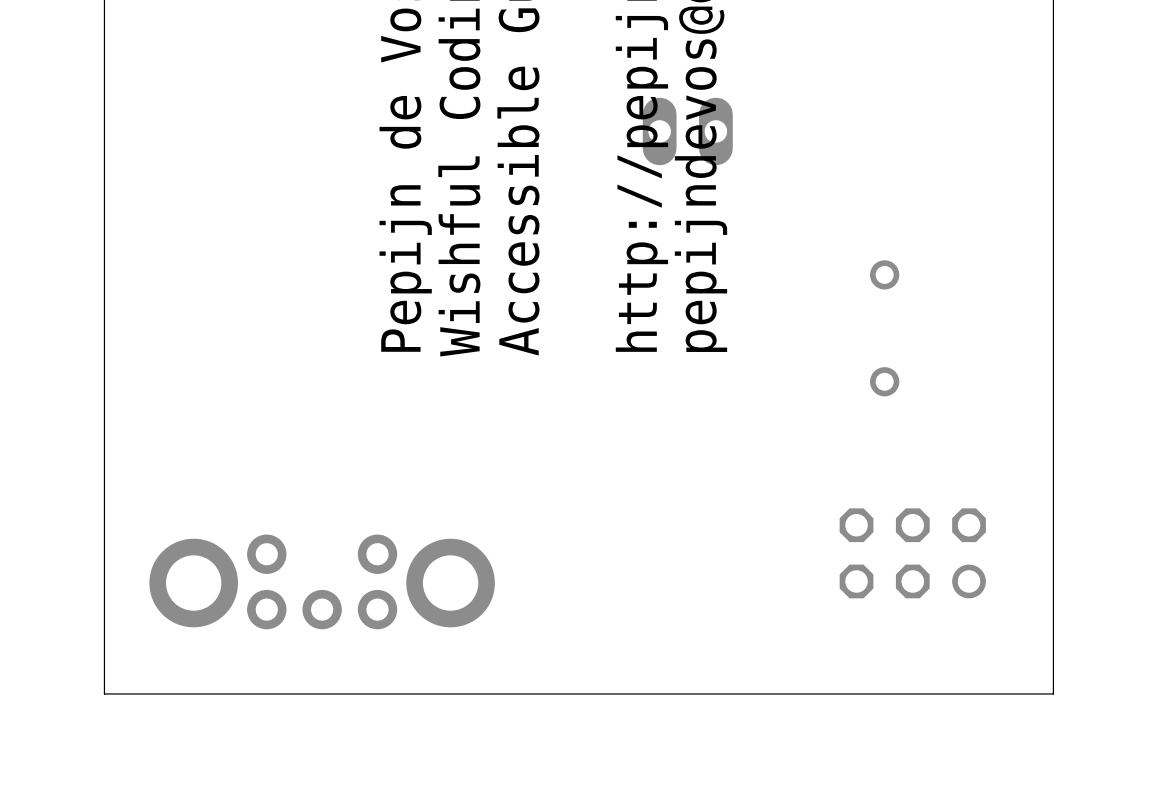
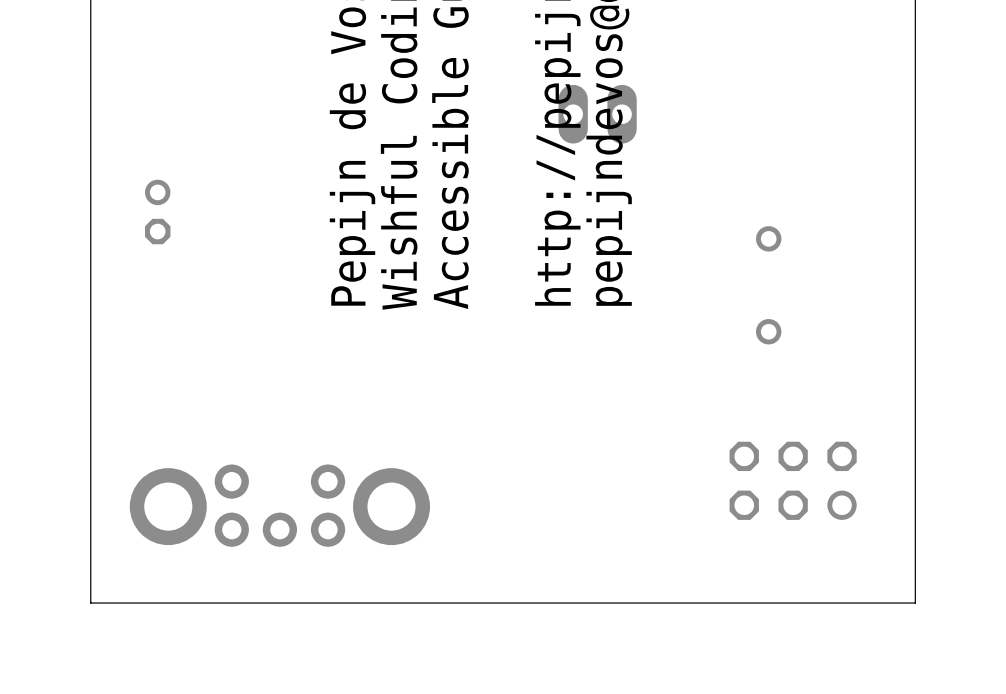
part: none -> (157, 211)

